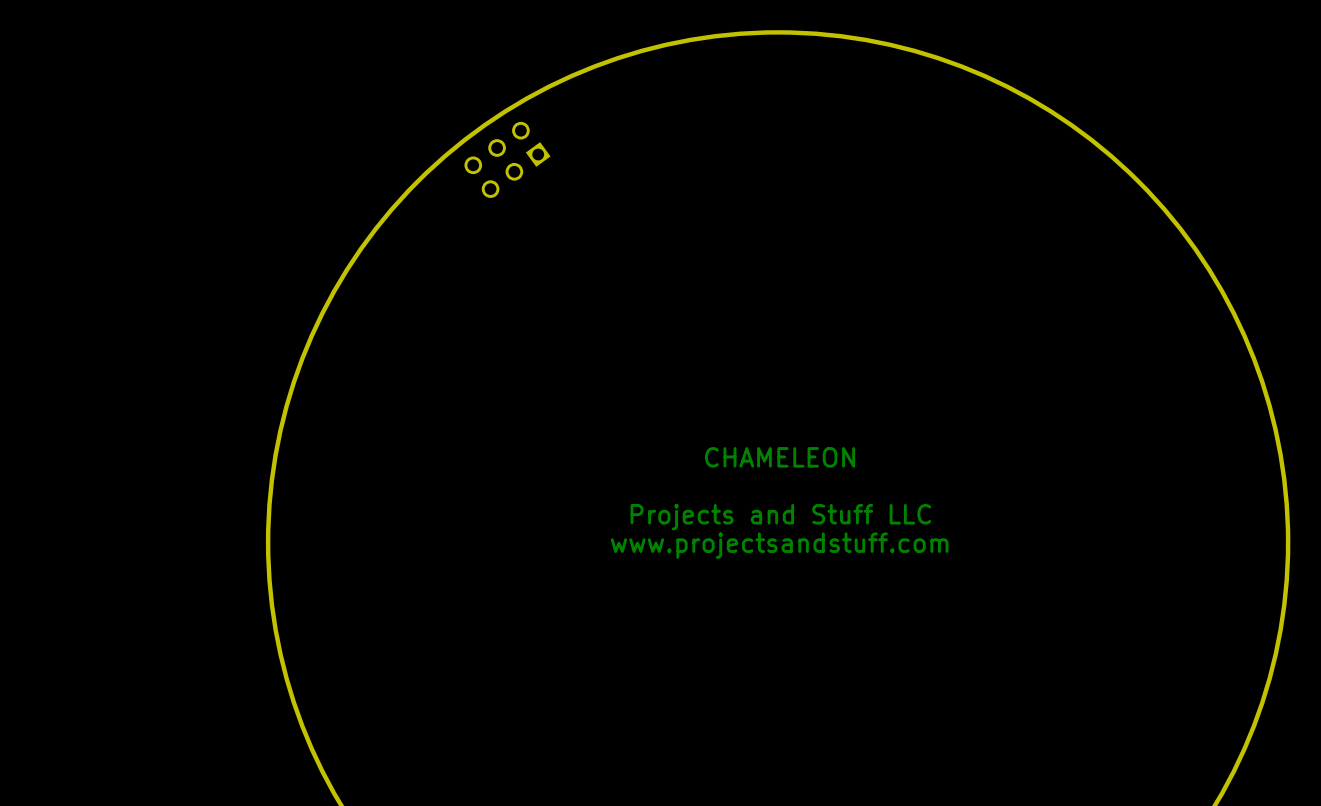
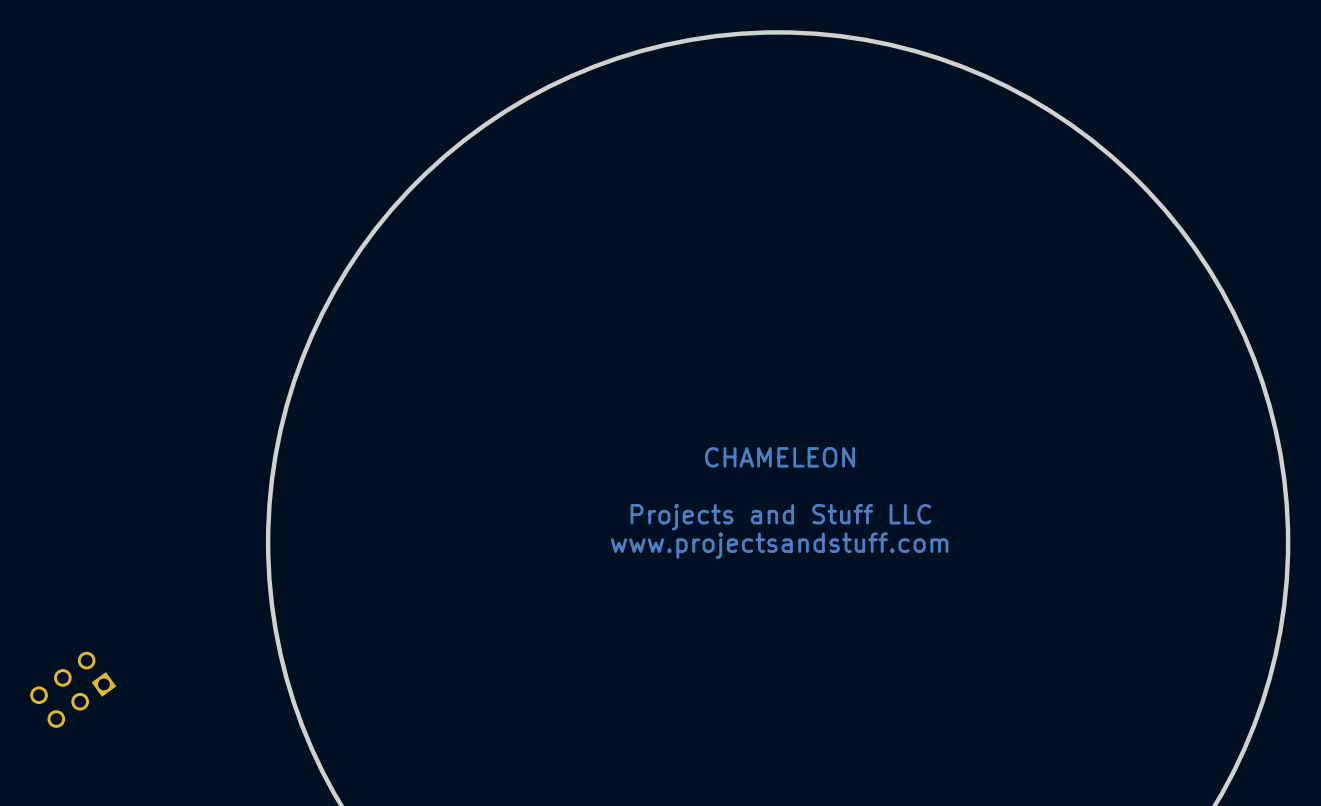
part: (507, 159) -> none
part: none -> (73, 689)

